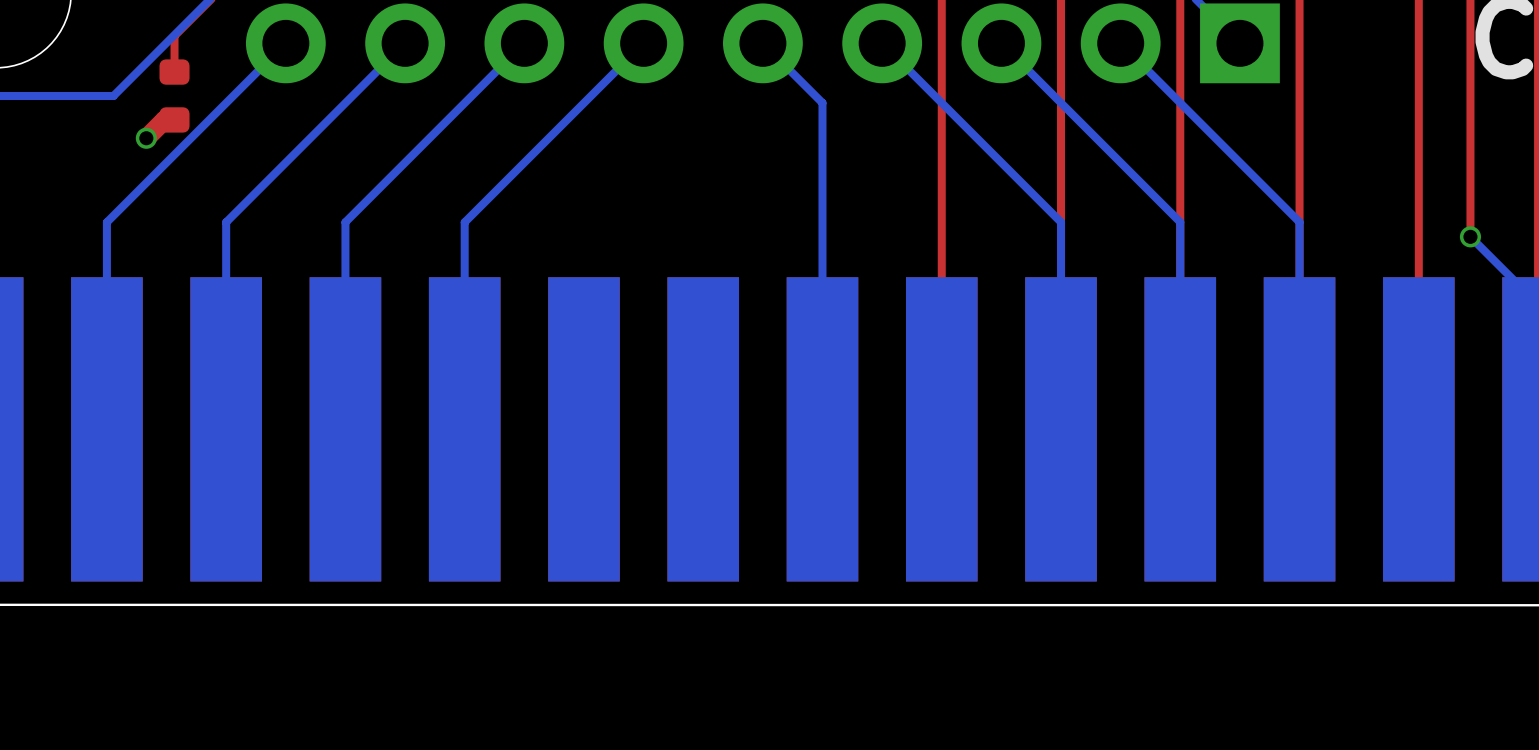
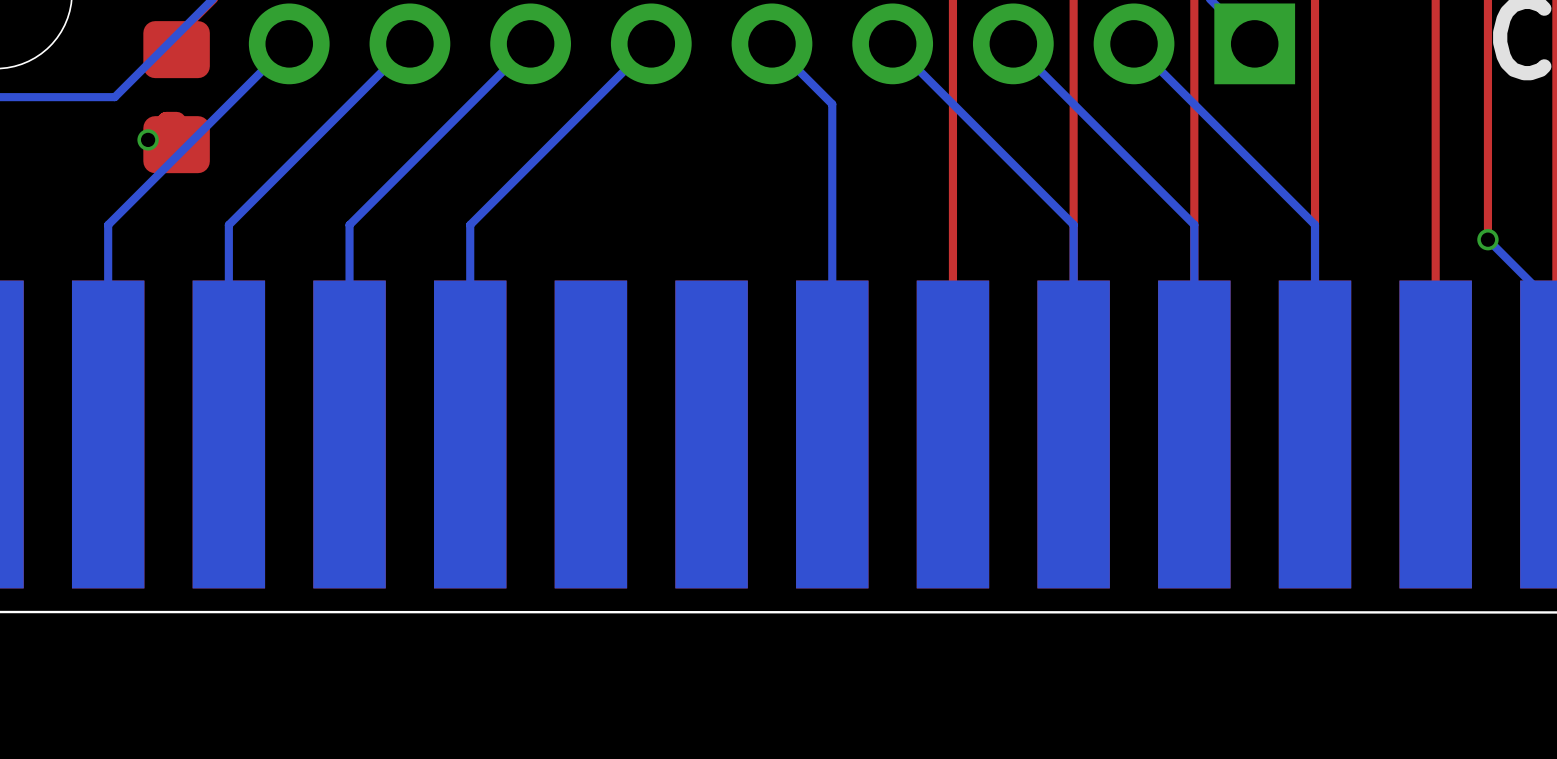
part footprint: [159, 59, 190, 133] -> [143, 21, 210, 174]

